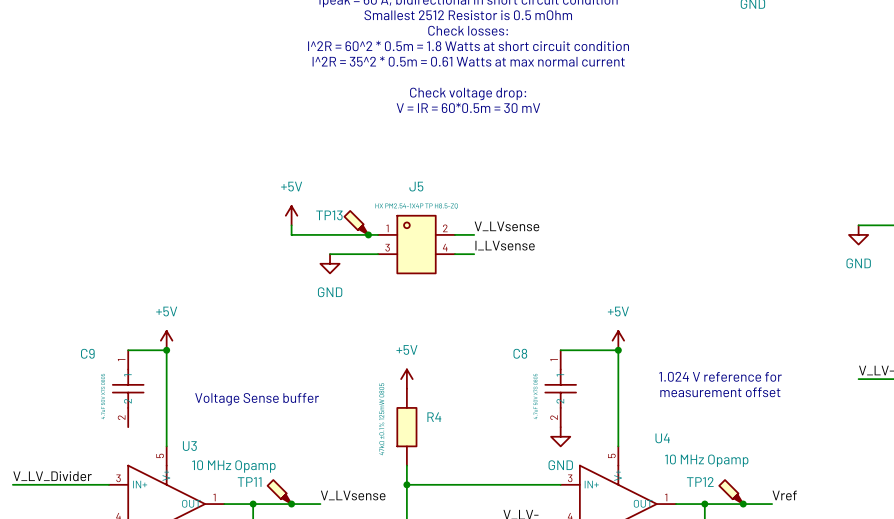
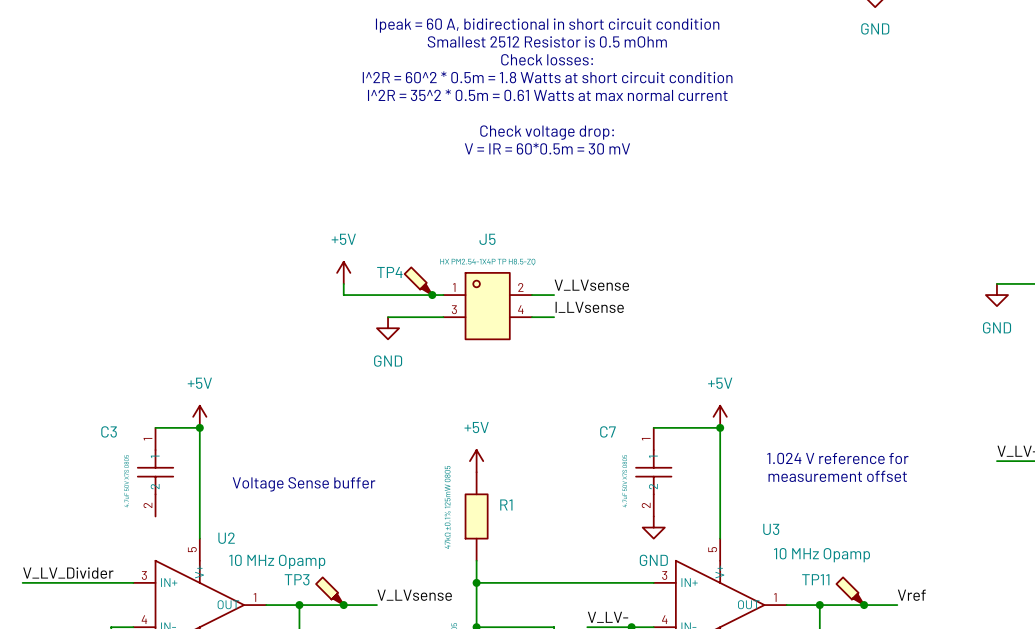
TP13 name: TP13 (329, 215) -> TP4 (389, 272)
C9 name: C9 (87, 353) -> C3 (109, 431)
C8 name: C8 (520, 353) -> C7 (607, 431)
R4 name: R4 (434, 417) -> R1 (506, 504)
U4 name: U4 (662, 438) -> U3 (771, 529)
U3 name: U3 (189, 446) -> U2 (226, 538)
TP11 name: TP11 (249, 482) -> TP3 (297, 579)
TP12 name: TP12 (700, 482) -> TP11 (815, 579)

